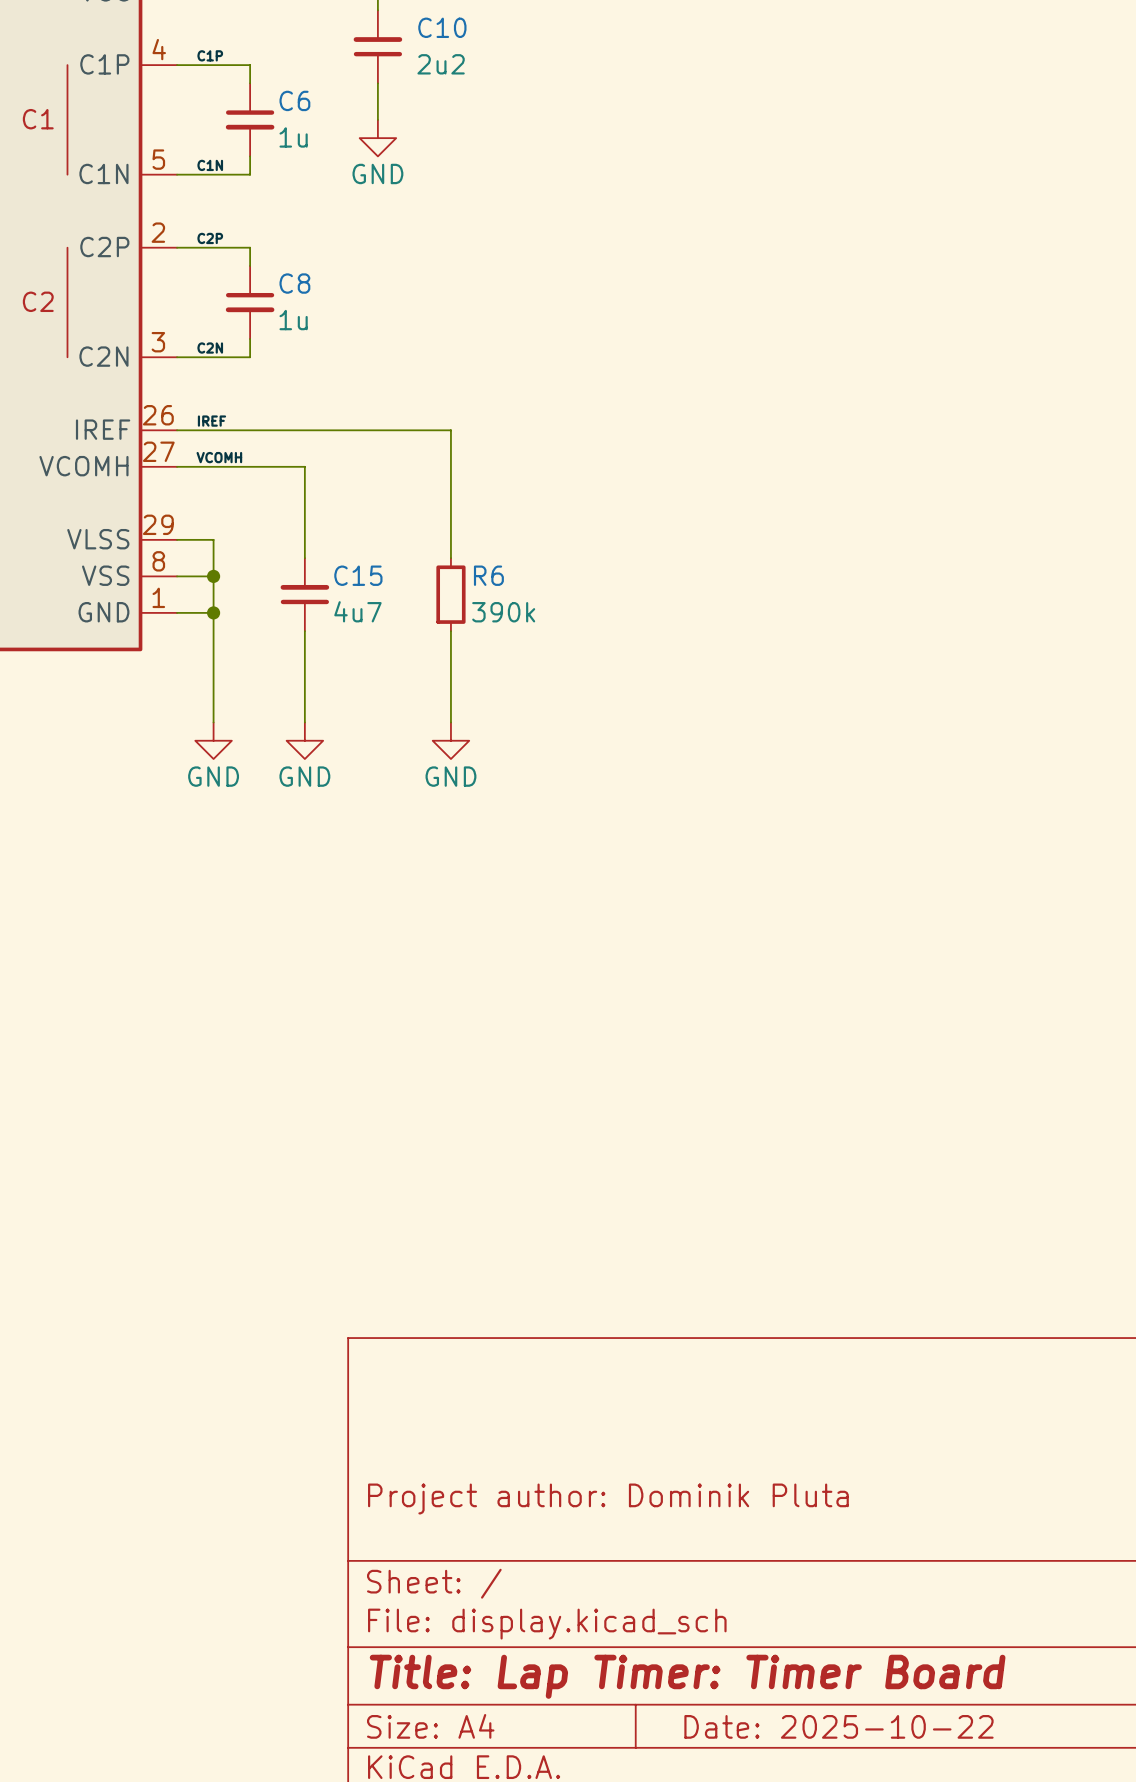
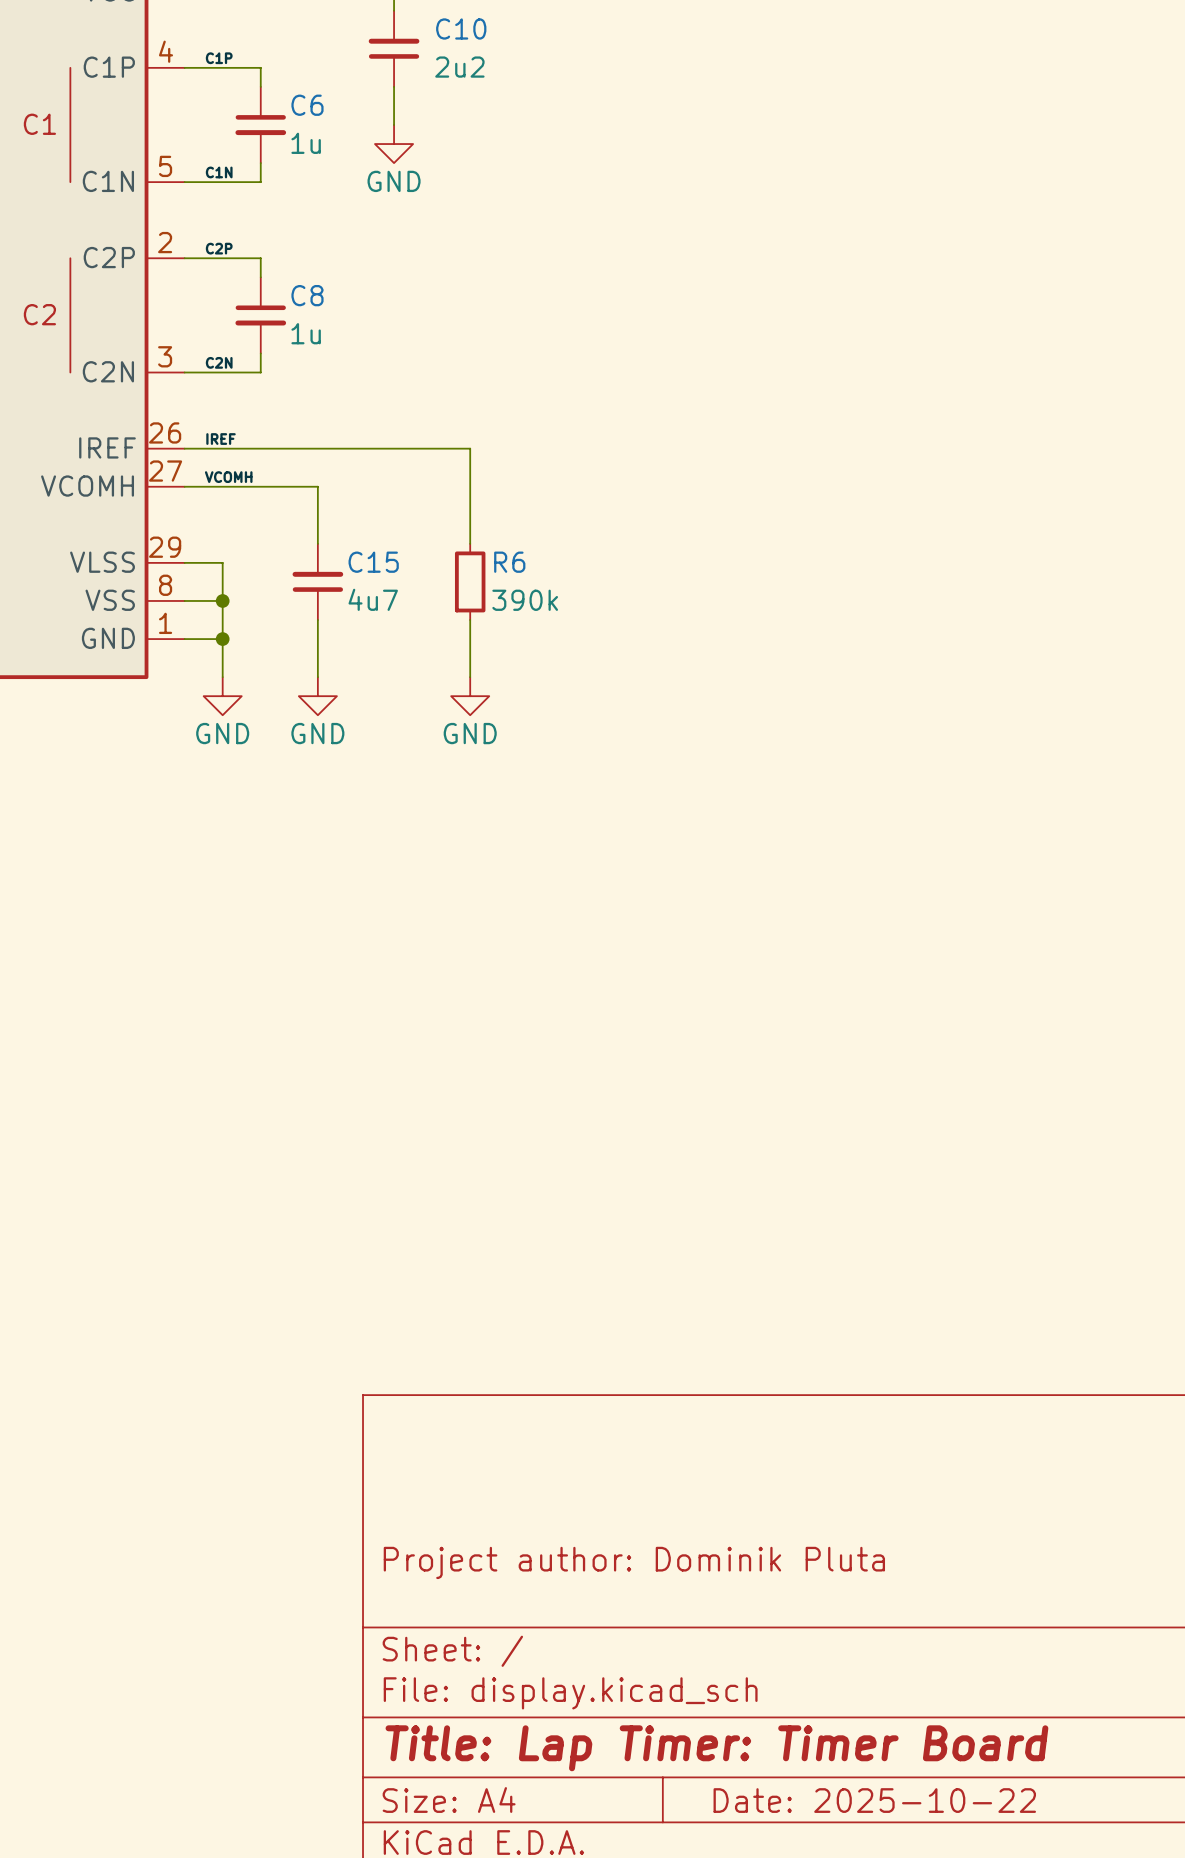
wire: (450, 521) (450, 558) -> (470, 620) (470, 658)
C15 position: (304, 594) -> (317, 581)
R6 position: (450, 594) -> (470, 581)
wire: (213, 649) (213, 722) -> none
wire: (304, 649) (304, 722) -> none
wire: (450, 649) (450, 722) -> none
power symbol: none -> GND (222, 696)
power symbol: none -> GND (317, 696)
power symbol: GND (213, 740) -> none
power symbol: GND (304, 740) -> none
power symbol position: GND (450, 740) -> GND (470, 696)

